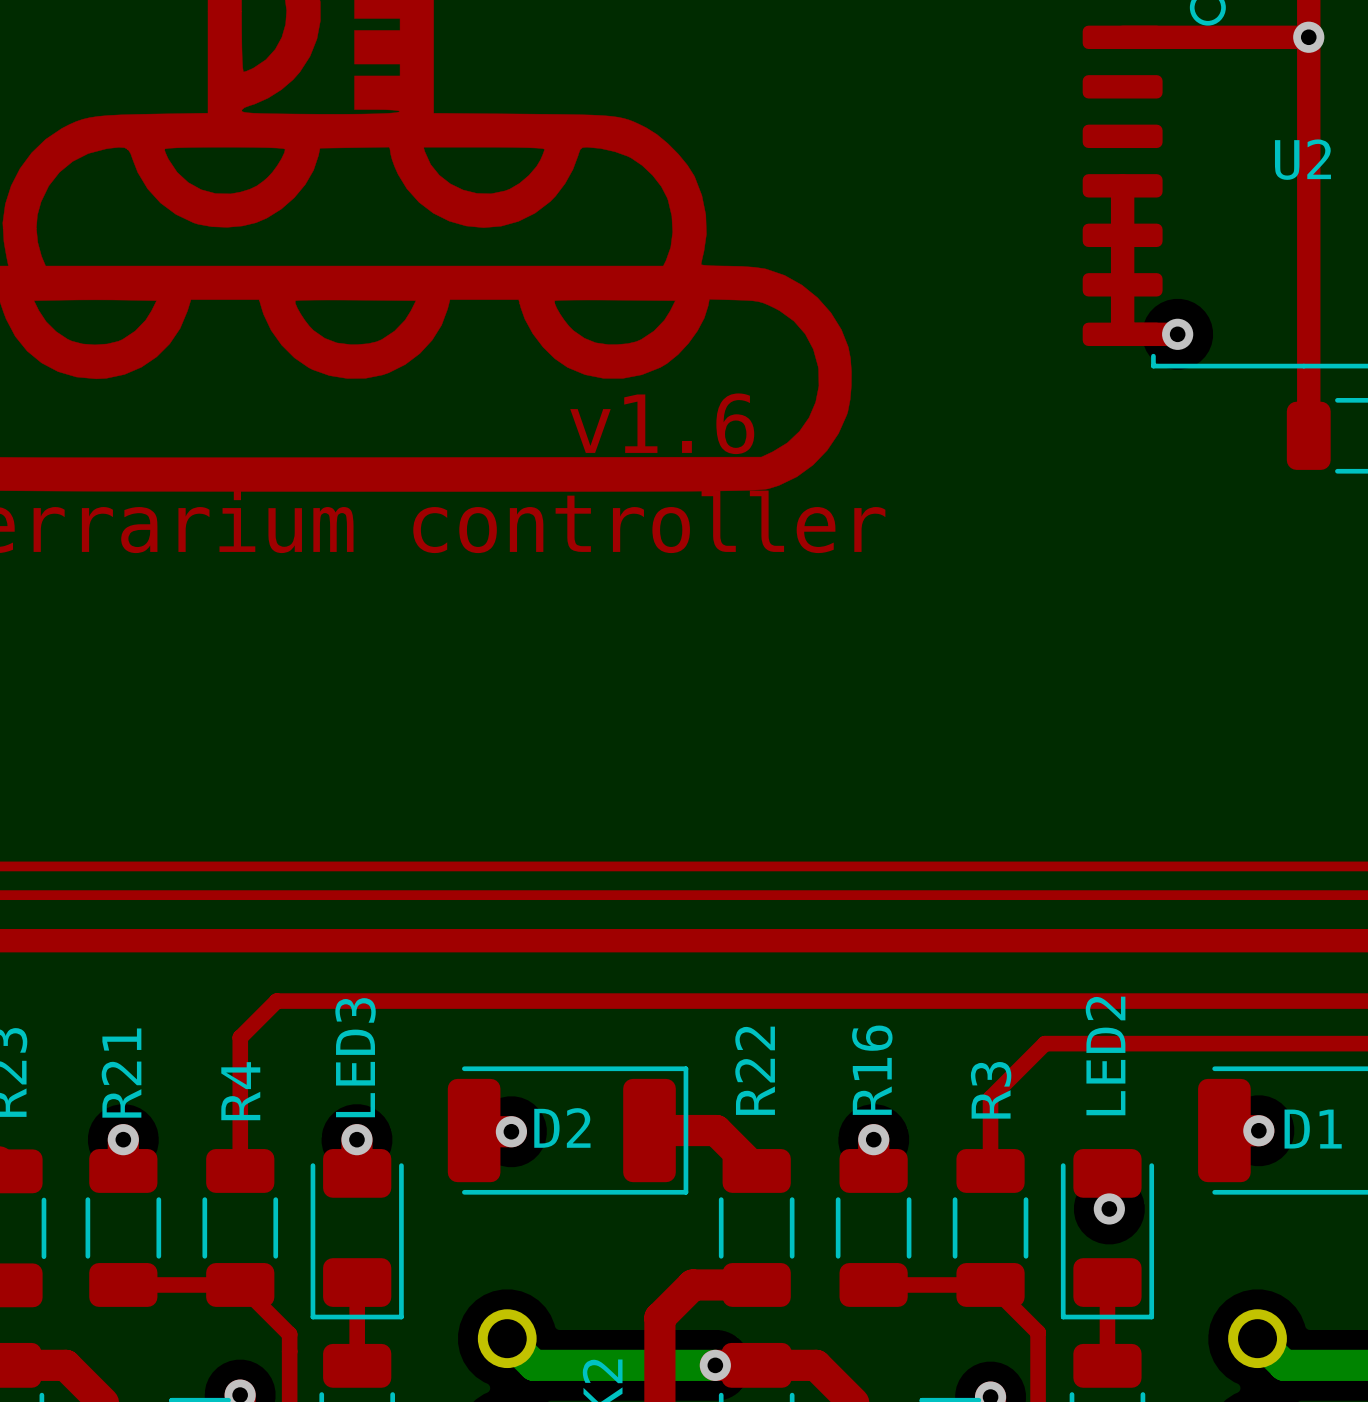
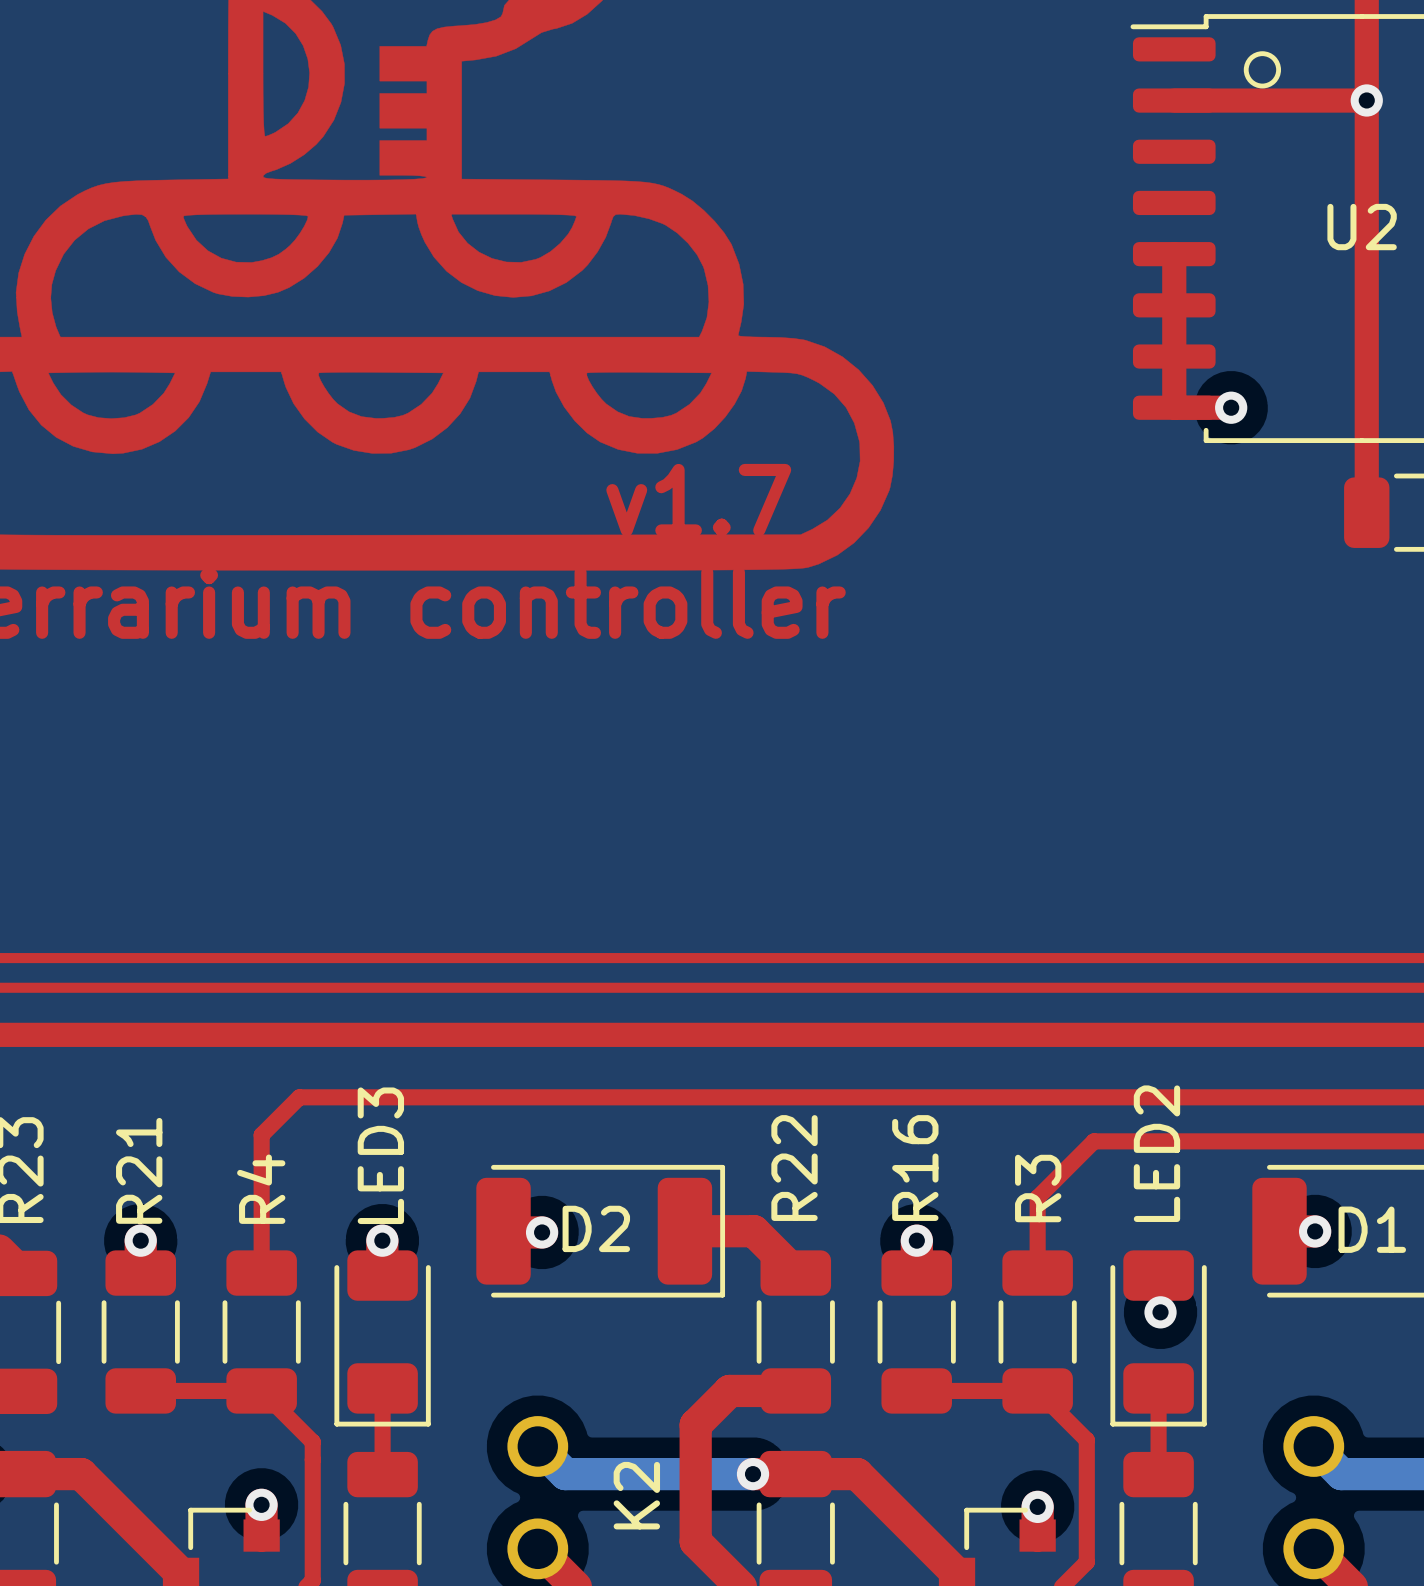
text: v1.6 (662, 423) -> v1.7 (698, 500)

